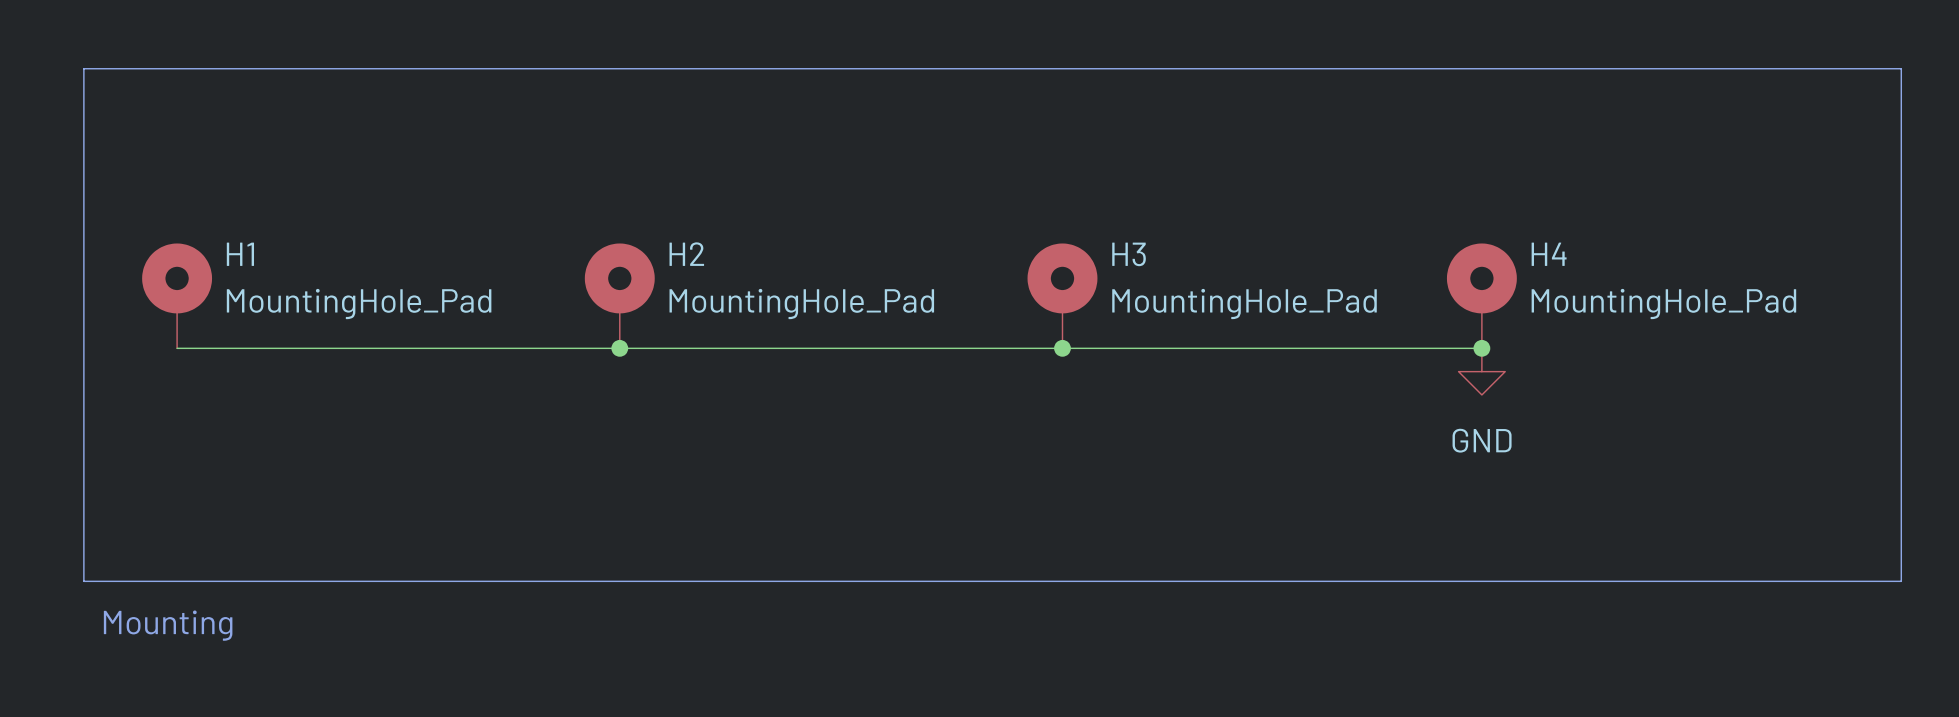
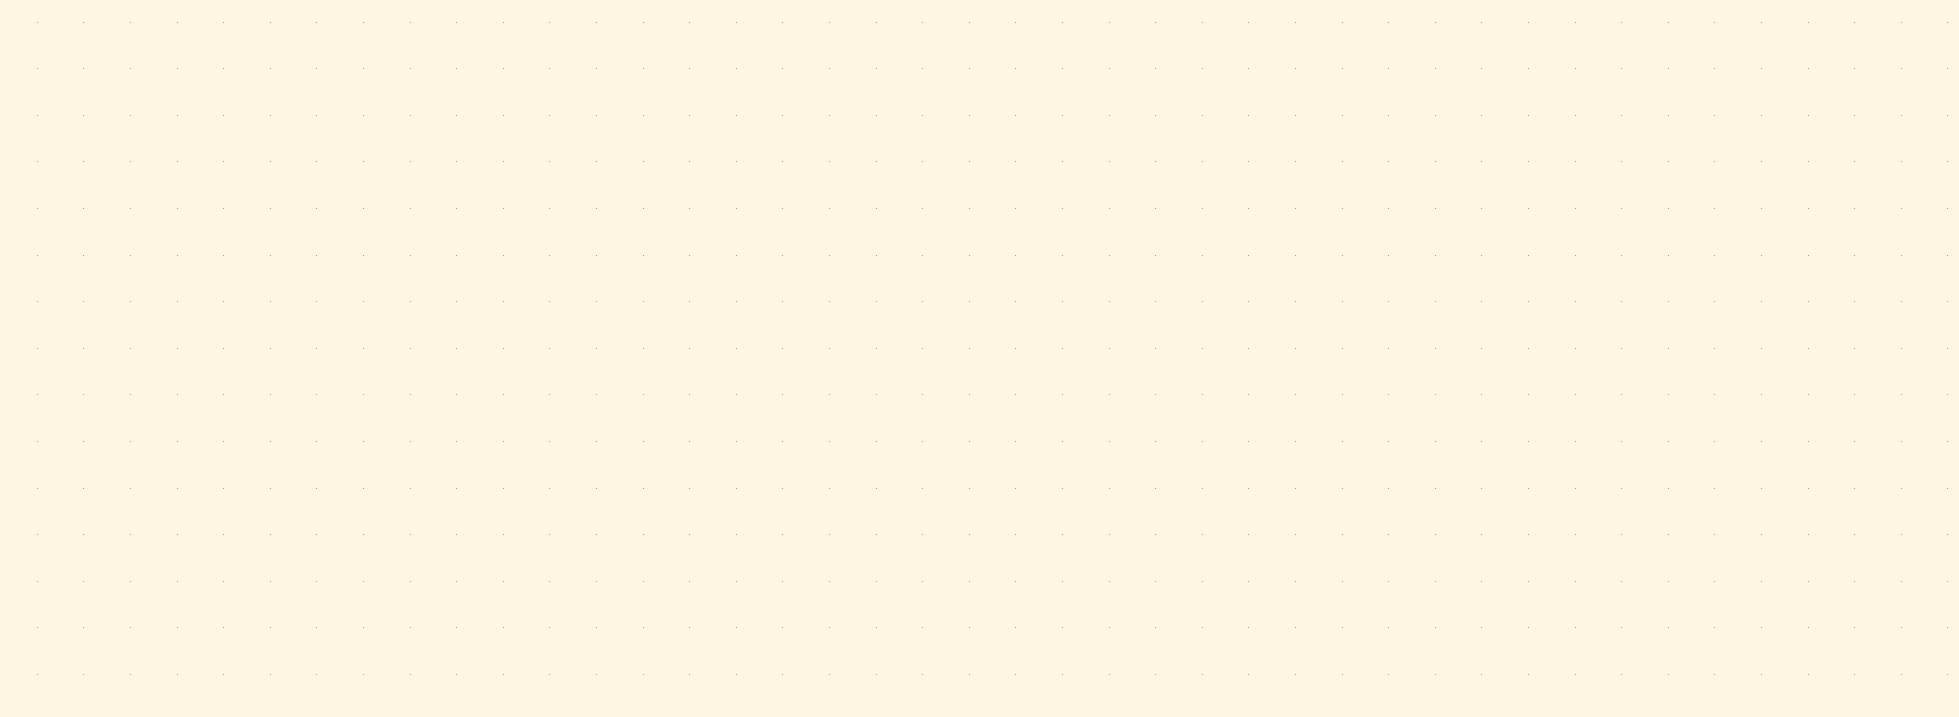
line: (83, 68) (1901, 68) (1901, 581) (83, 581) (83, 68) -> none
H1: MountingHole_Pad (177, 295) -> none
H2: MountingHole_Pad (619, 295) -> none
H3: MountingHole_Pad (1062, 295) -> none
H4: MountingHole_Pad (1481, 295) -> none
wire: (177, 348) (1481, 348) -> none
junction: (619, 348) -> none
junction: (1062, 348) -> none
junction: (1481, 348) -> none
power symbol: GND (1481, 371) -> none
text: Mounting (168, 625) -> none

